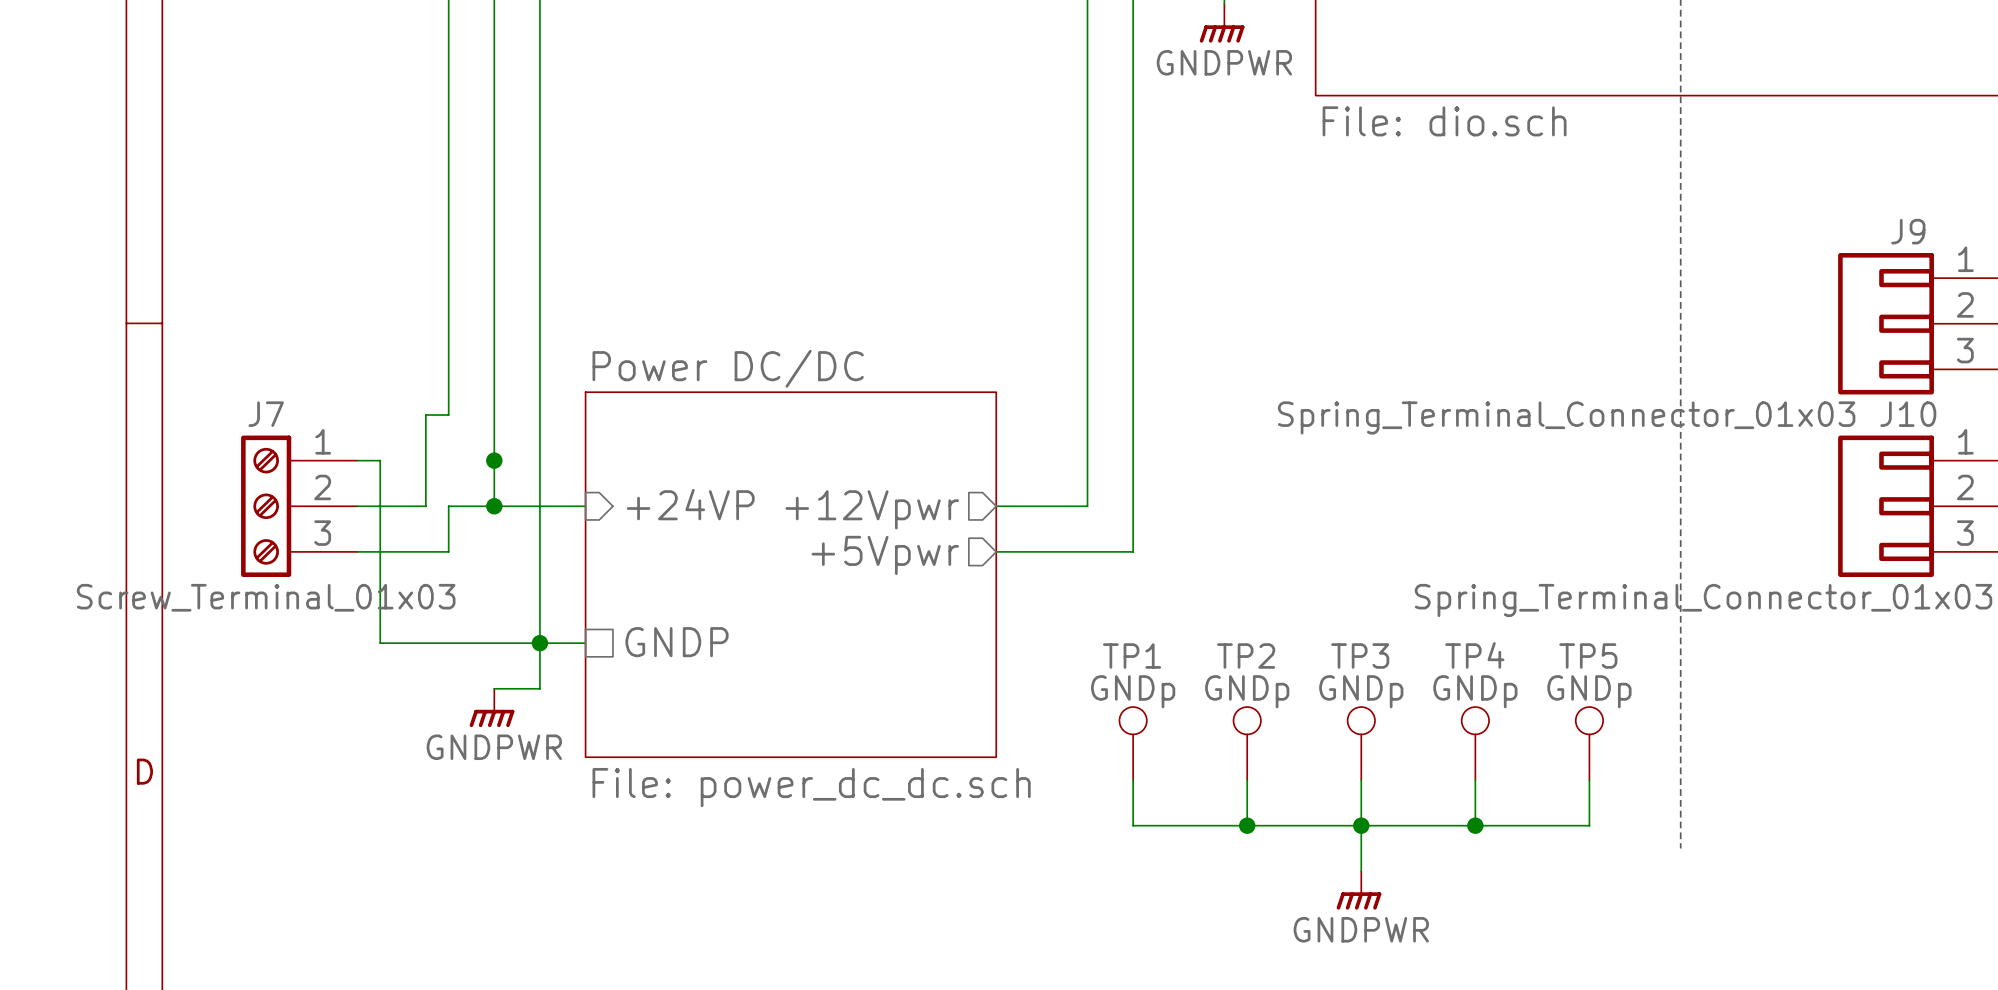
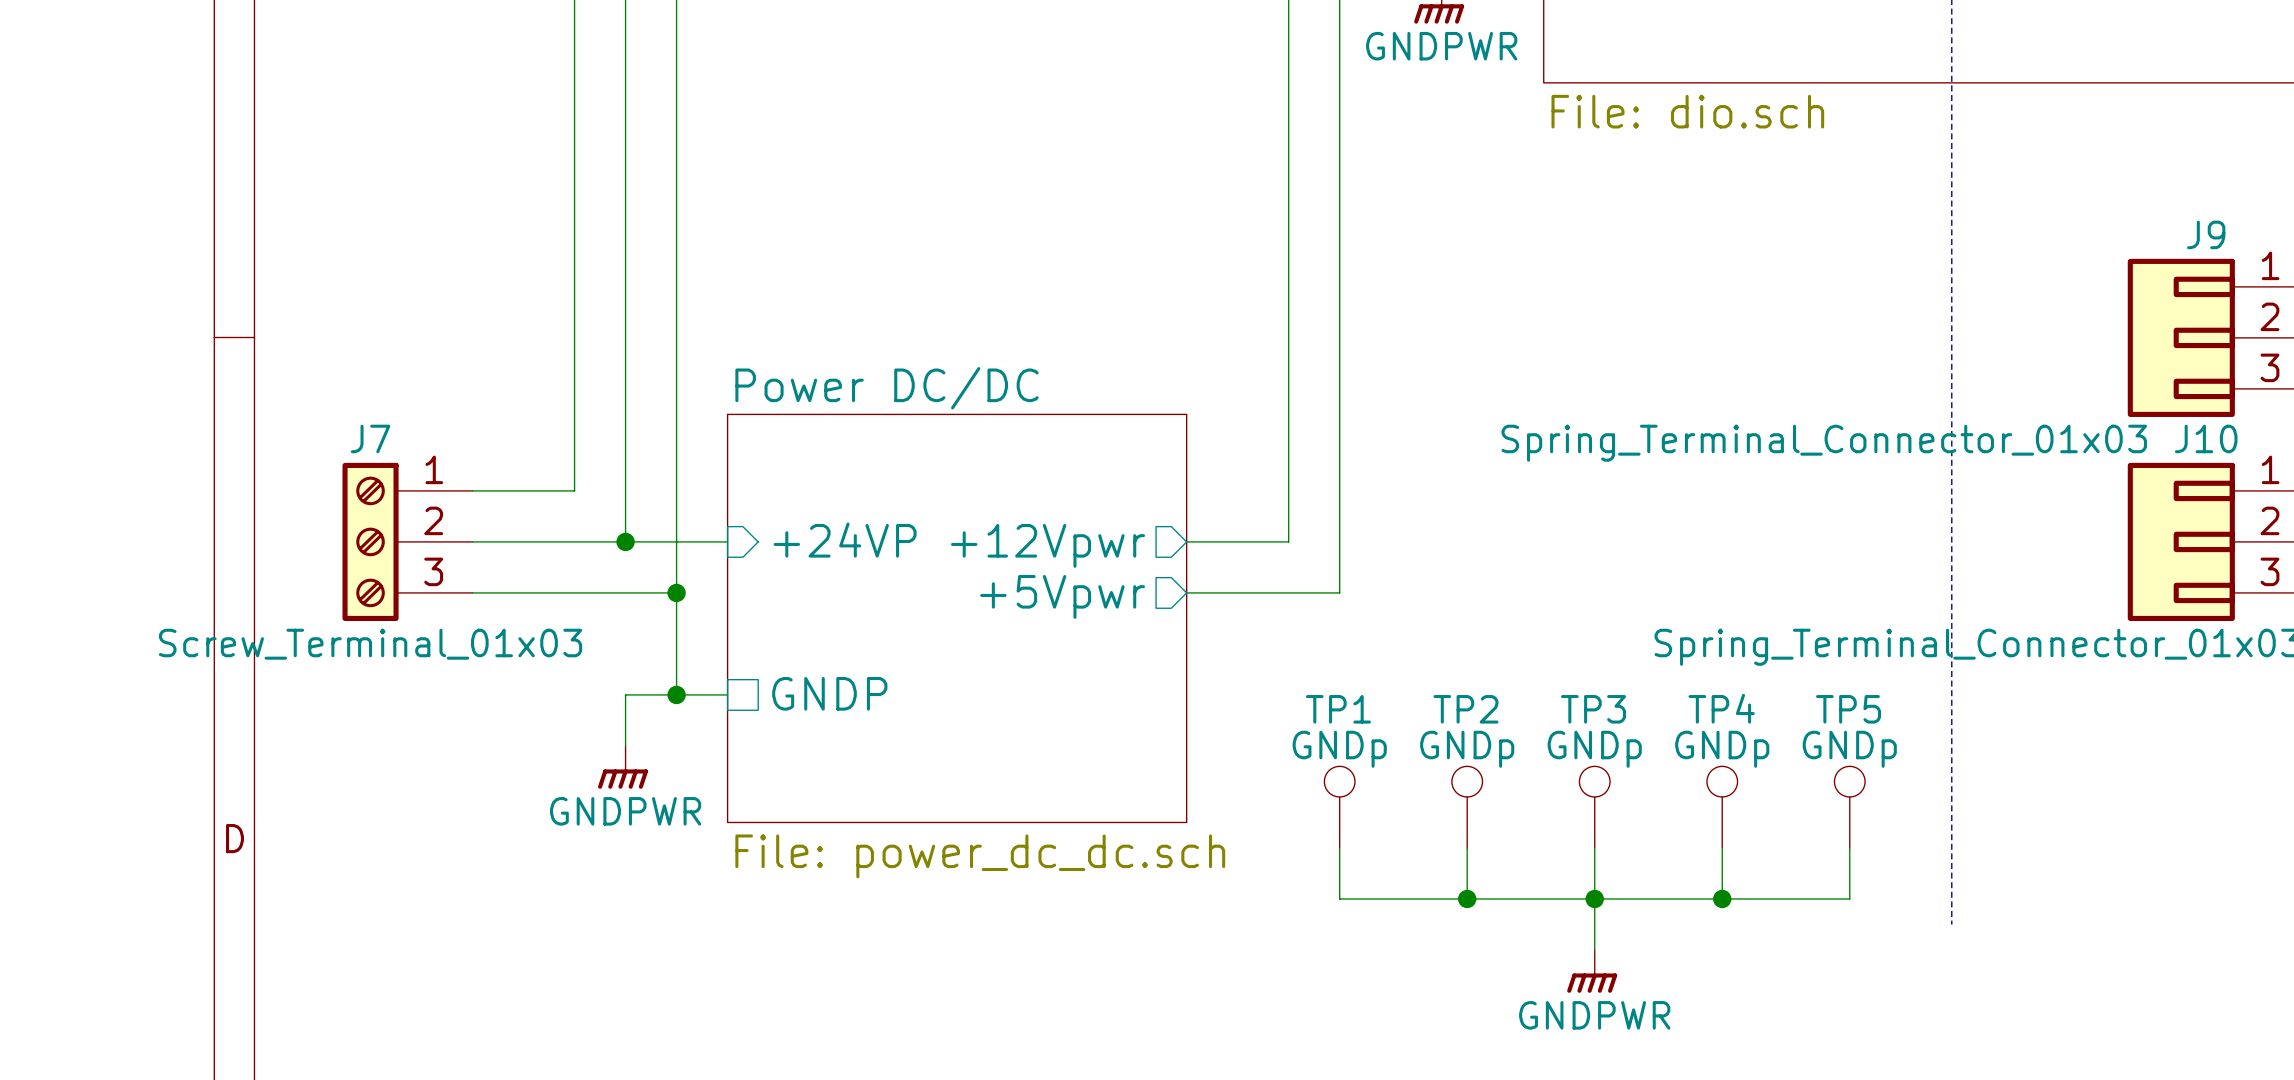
wire: (448, 415) (425, 415) (425, 506) -> (574, 439) (574, 490) (498, 490)
wire: (380, 460) (380, 643) (494, 643) -> none
junction position: (494, 460) -> (676, 592)
wire: (448, 506) (448, 551) -> (574, 541) (549, 541)
wire: none -> (574, 592) (676, 592)
wire: (539, 643) (539, 688) (494, 688) -> (625, 694) (625, 745)

